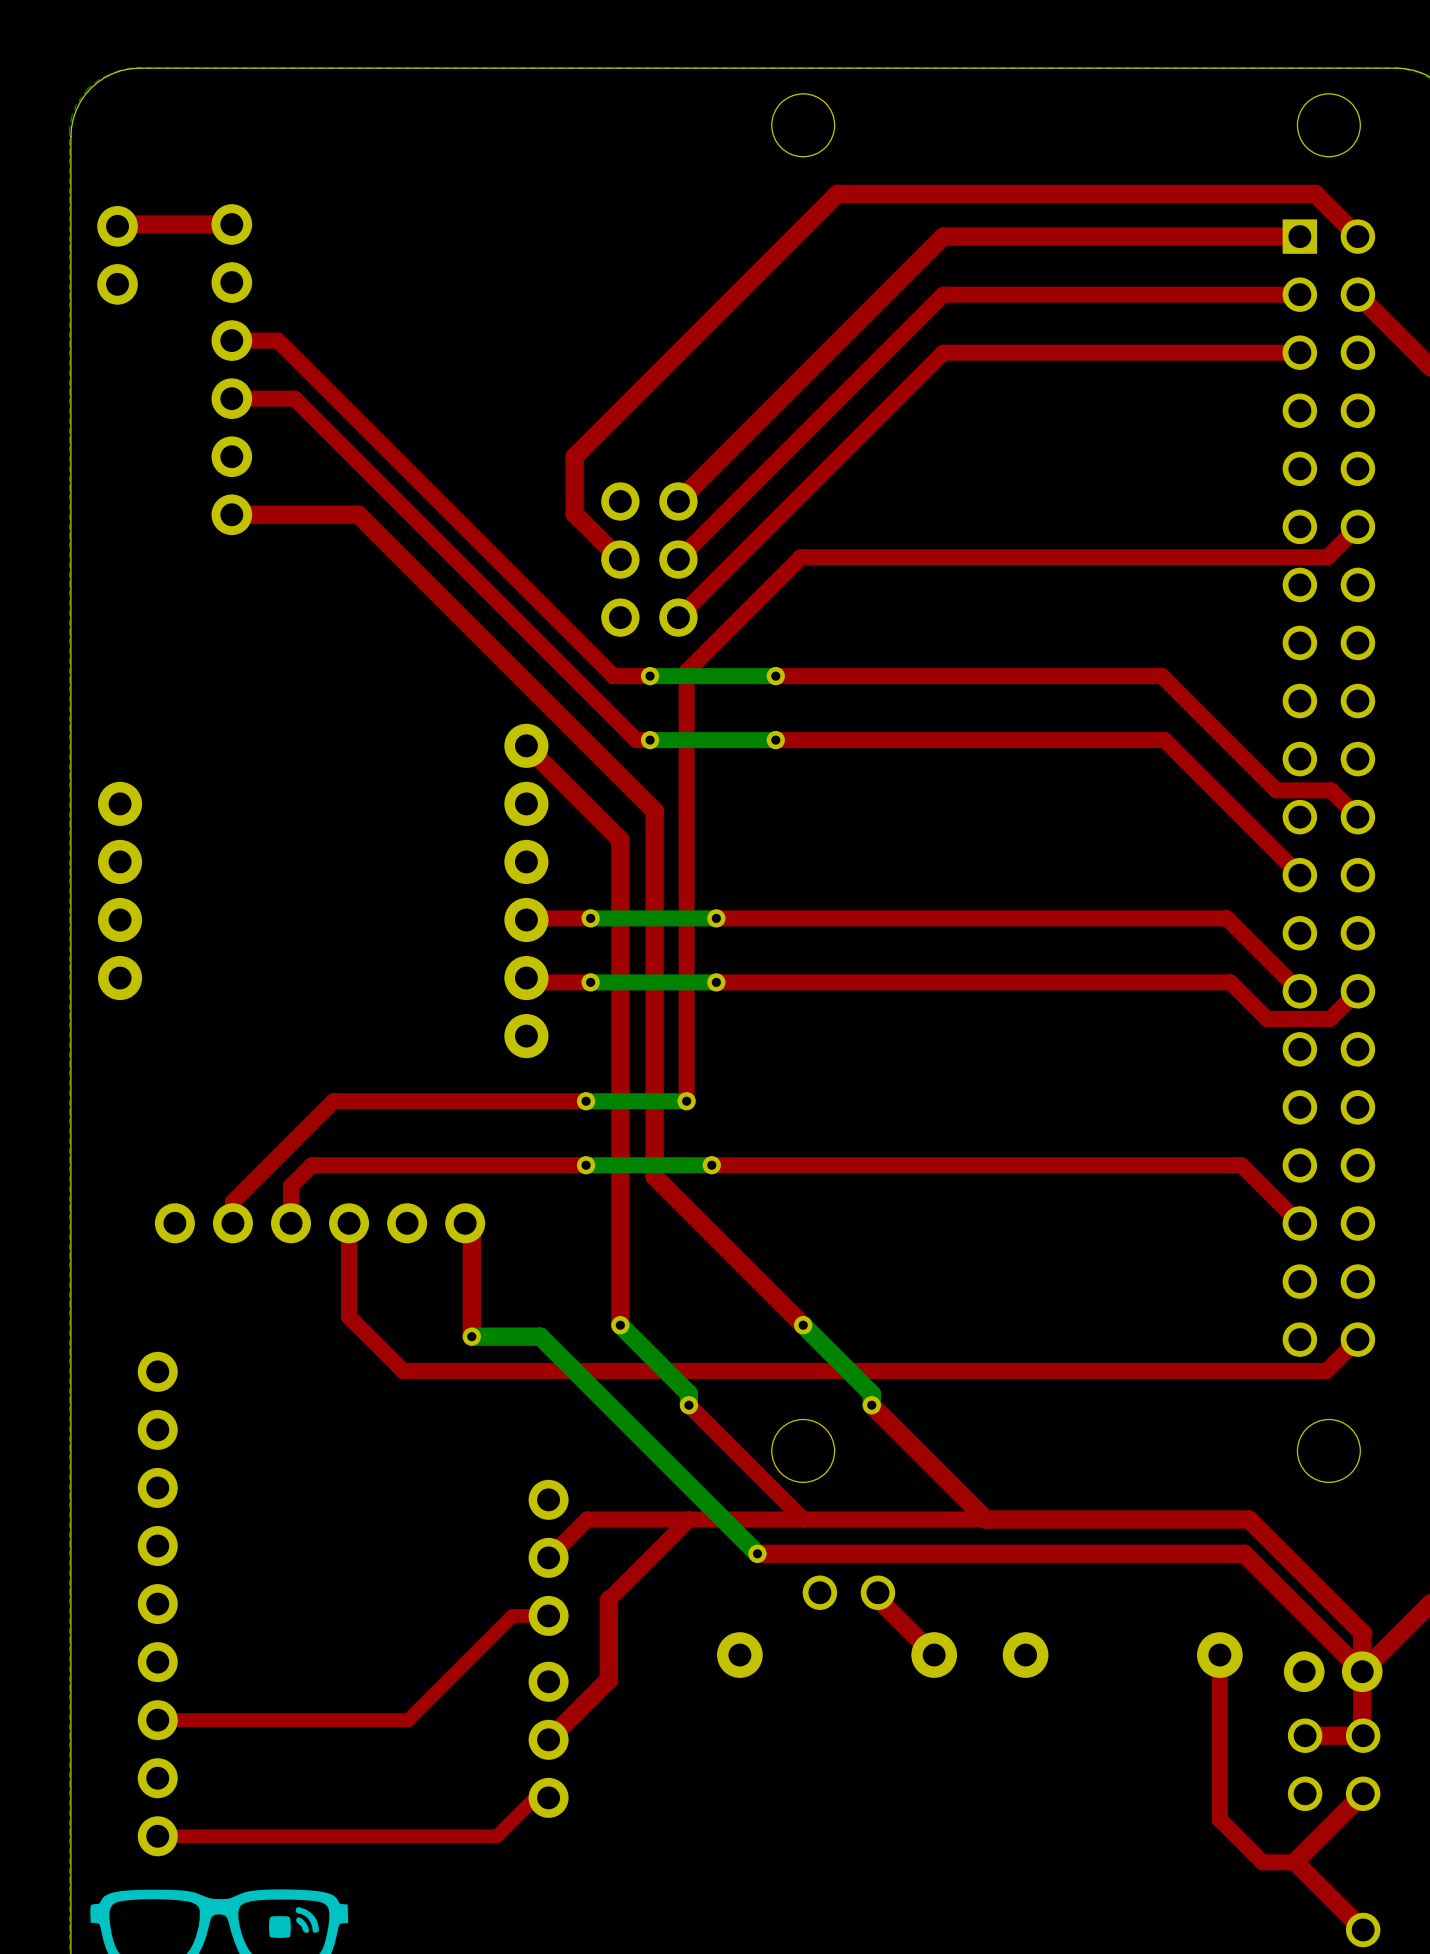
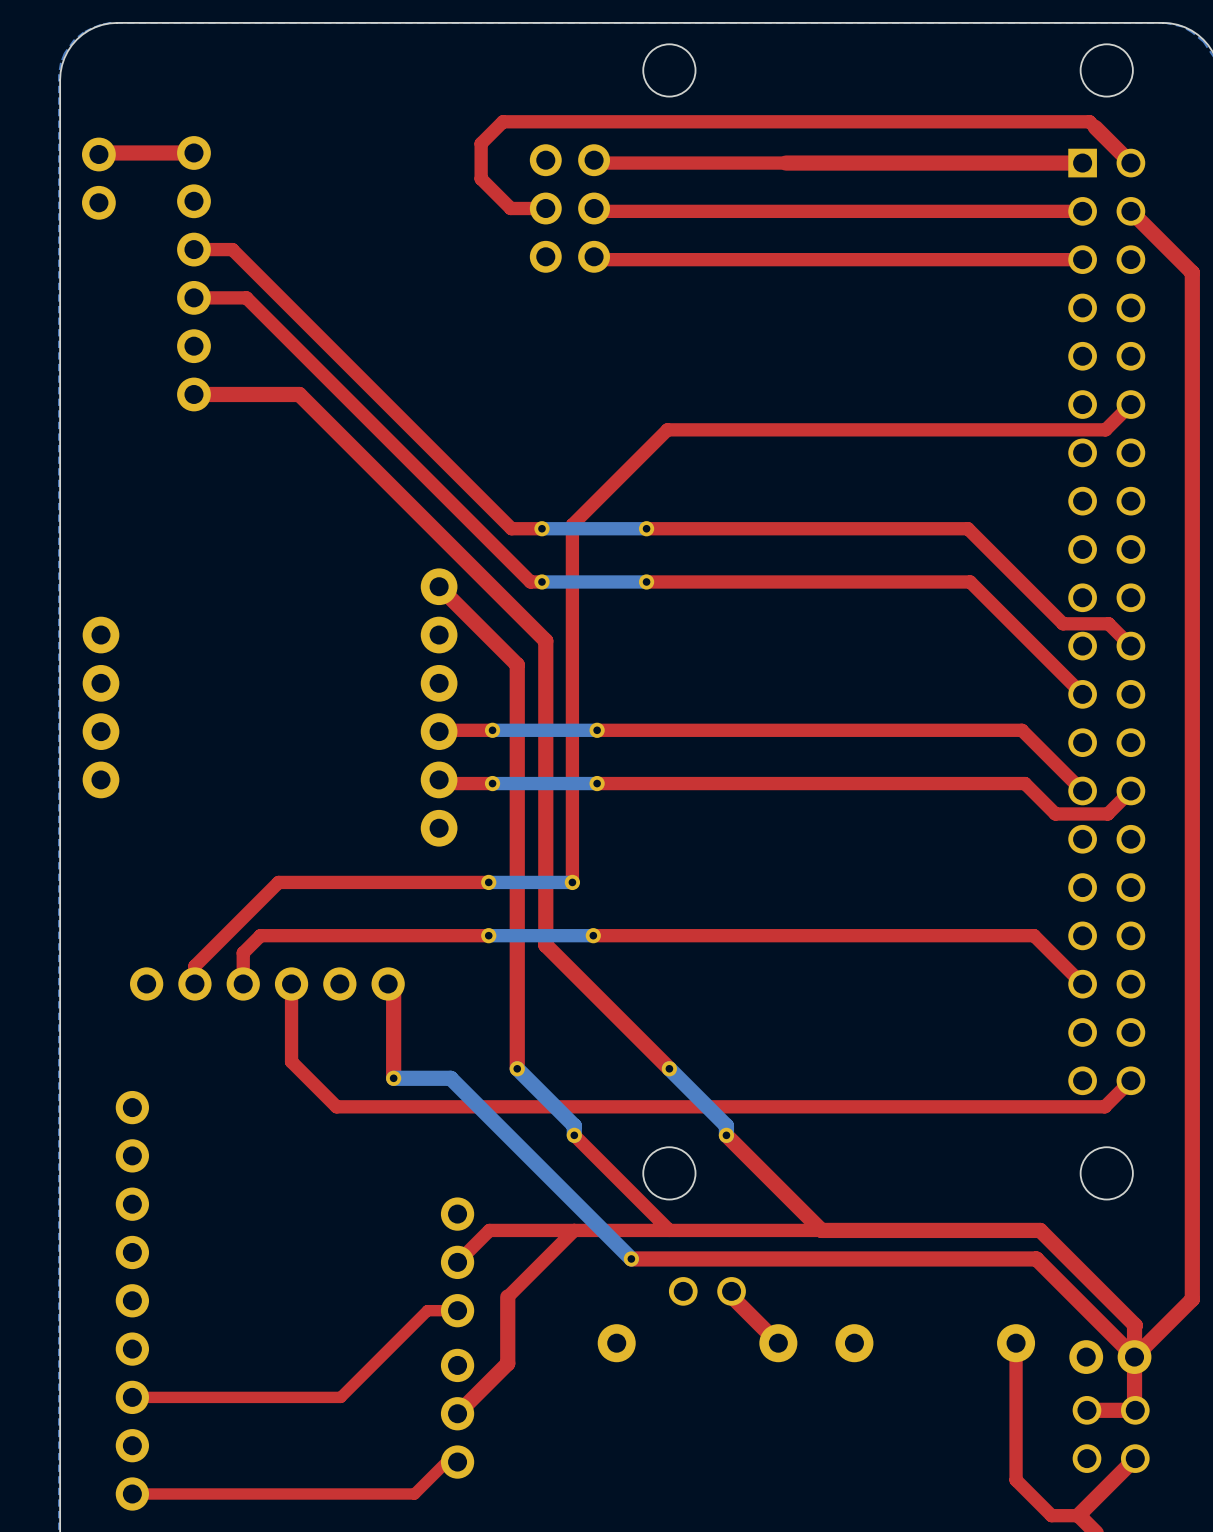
top track: (1315, 193) (837, 193) (574, 456) (574, 513) (620, 559) -> (1095, 127) (1089, 121) (503, 121) (481, 143) (481, 178) (510, 208) (545, 208)
top track: (943, 236) (678, 501) -> (785, 163) (596, 163) (594, 160)
top track: (943, 294) (678, 559) -> (785, 211) (596, 211) (594, 208)
top track: (943, 352) (678, 617) -> (785, 259) (596, 259) (594, 256)
part position: (649, 559) -> (569, 208)

